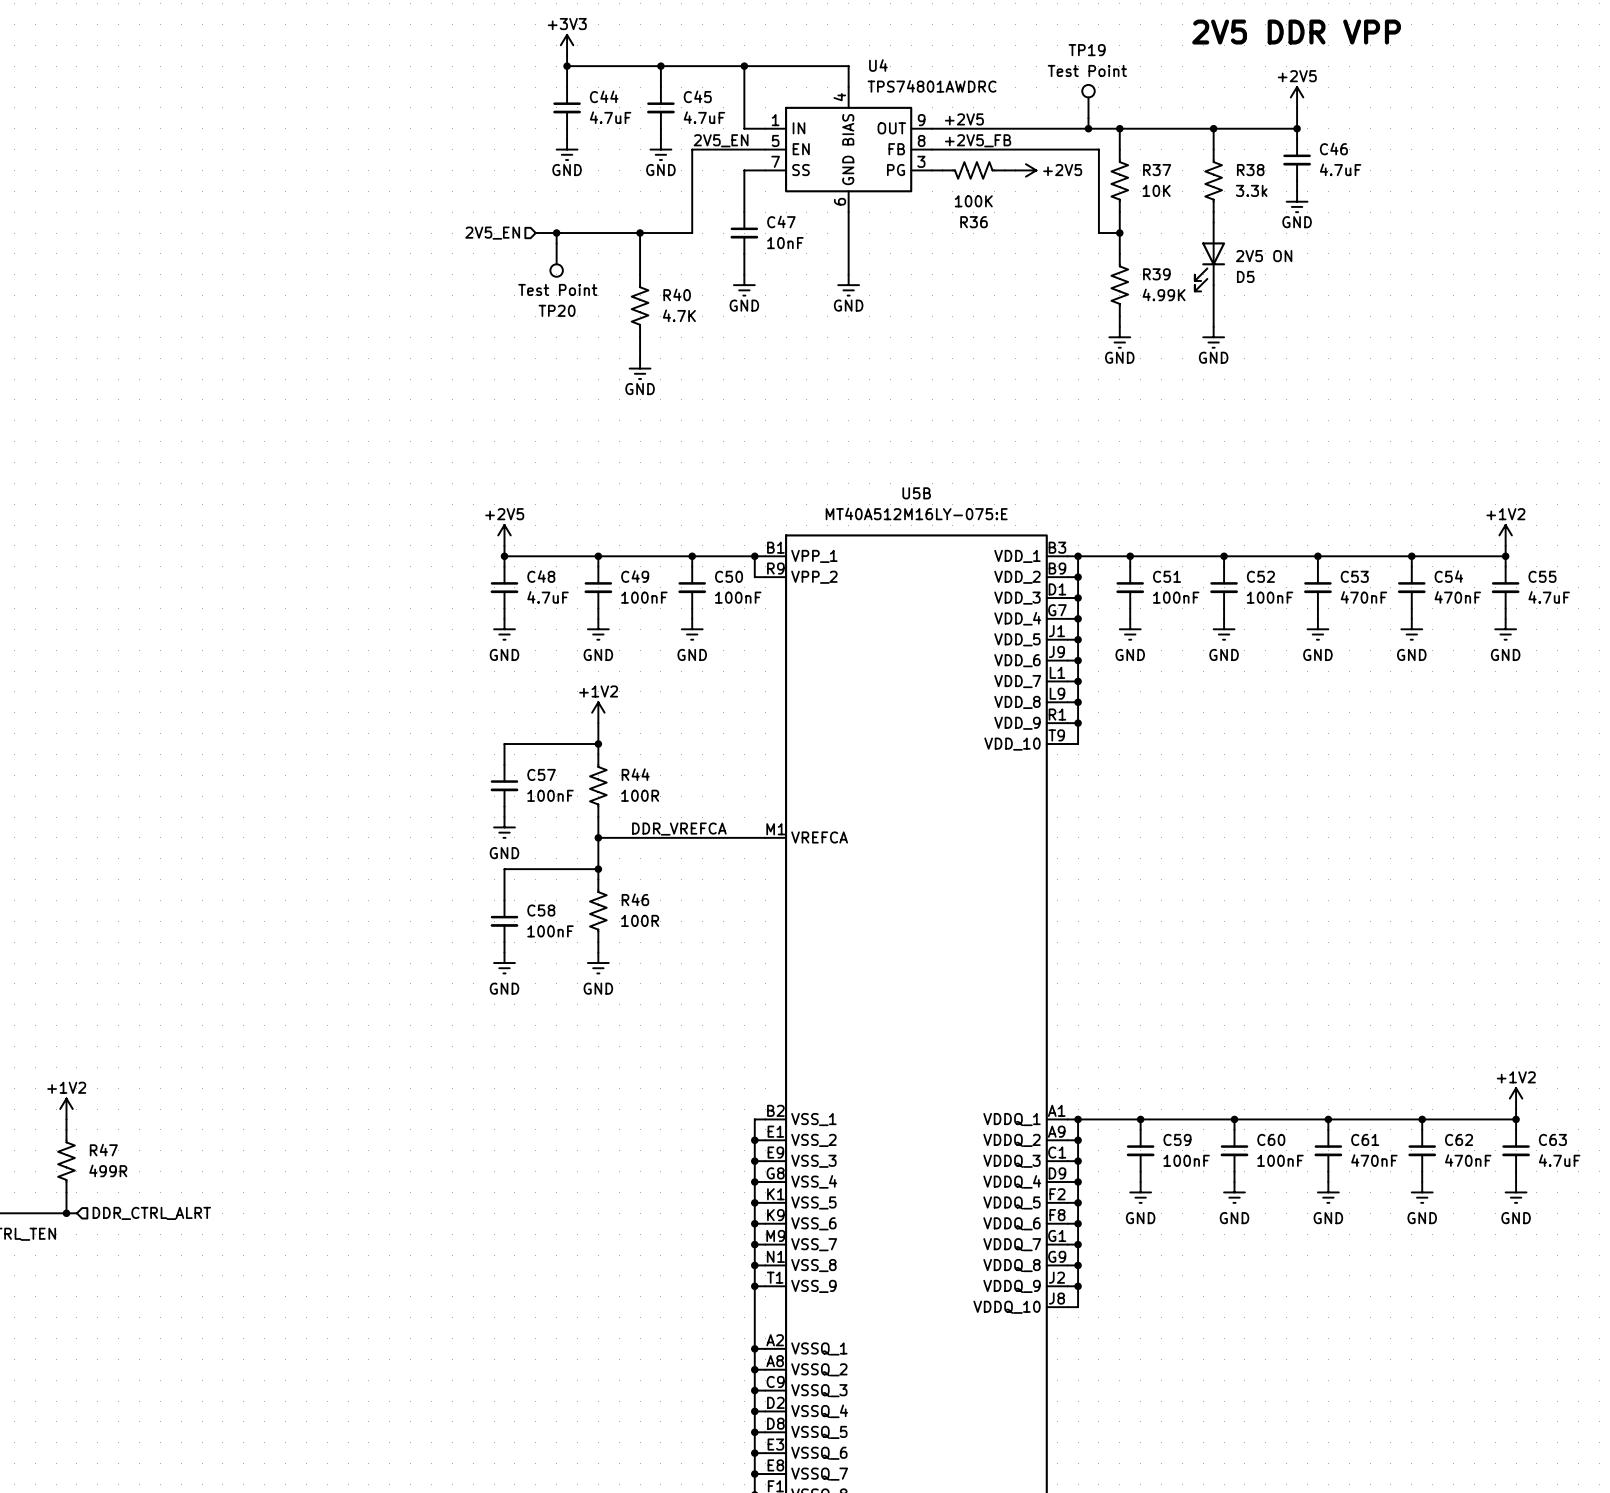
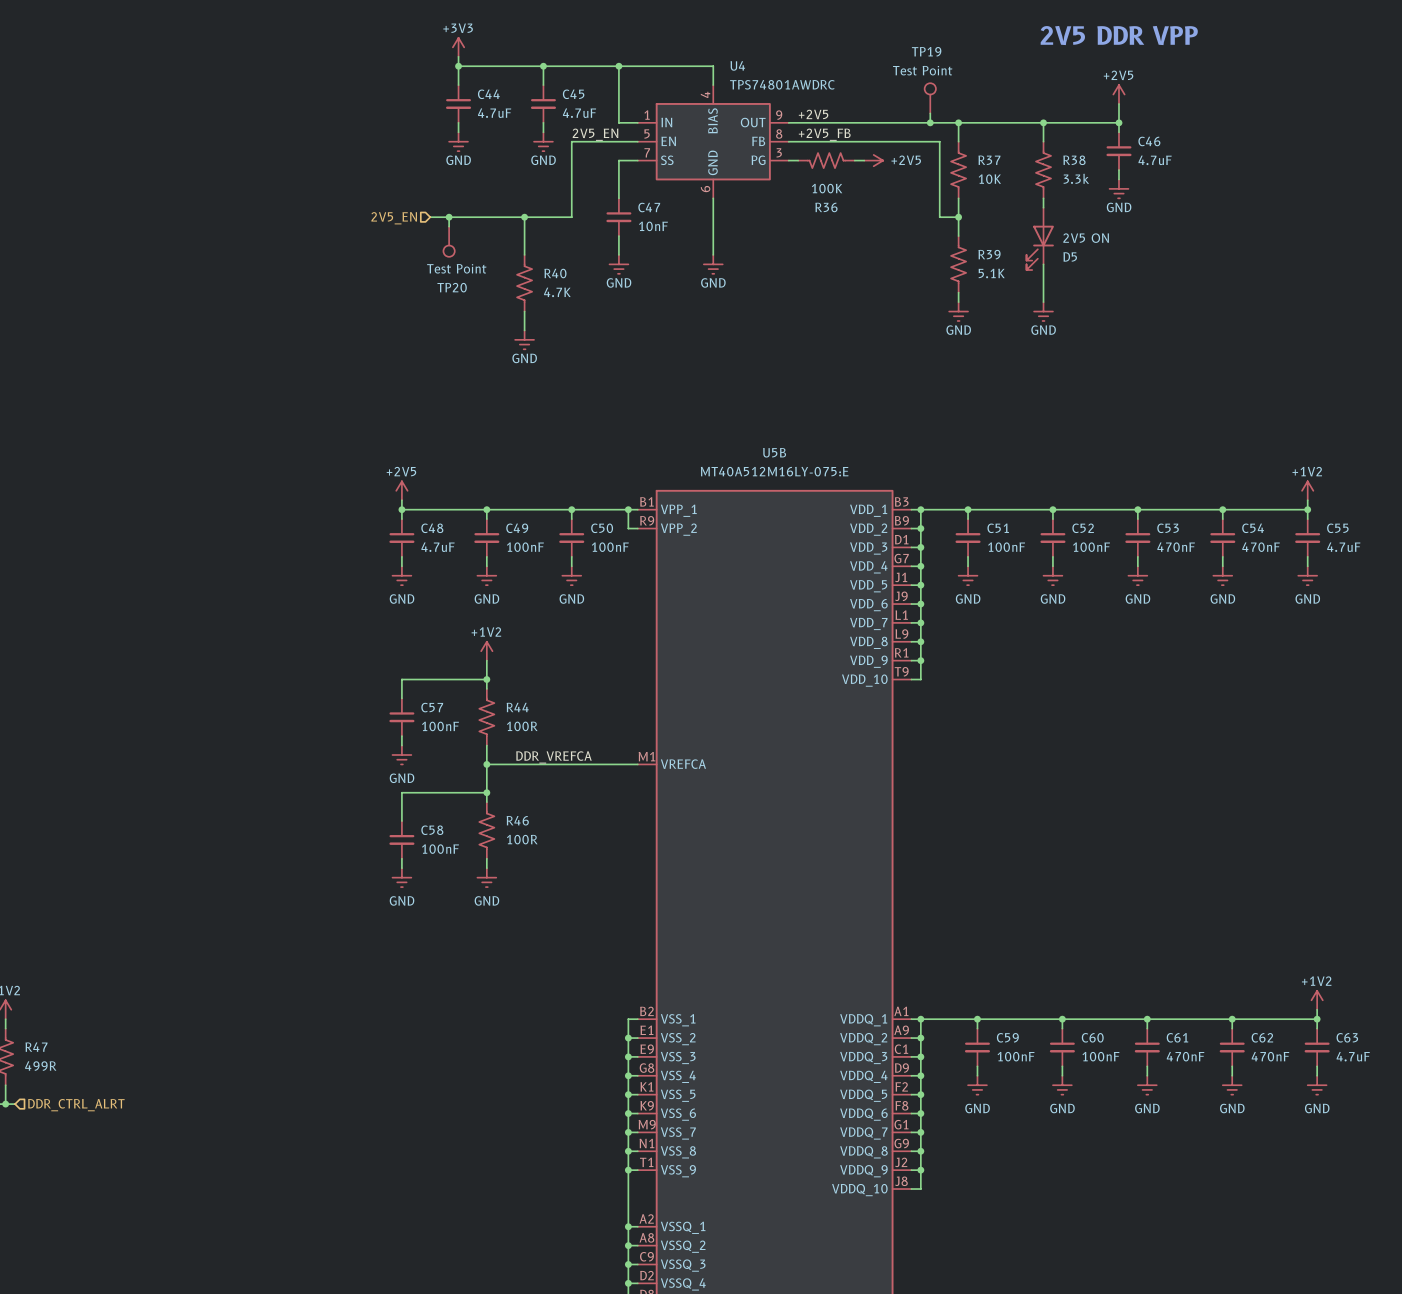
R39 value: 4.99K (1164, 294) -> 5.1K (991, 273)

